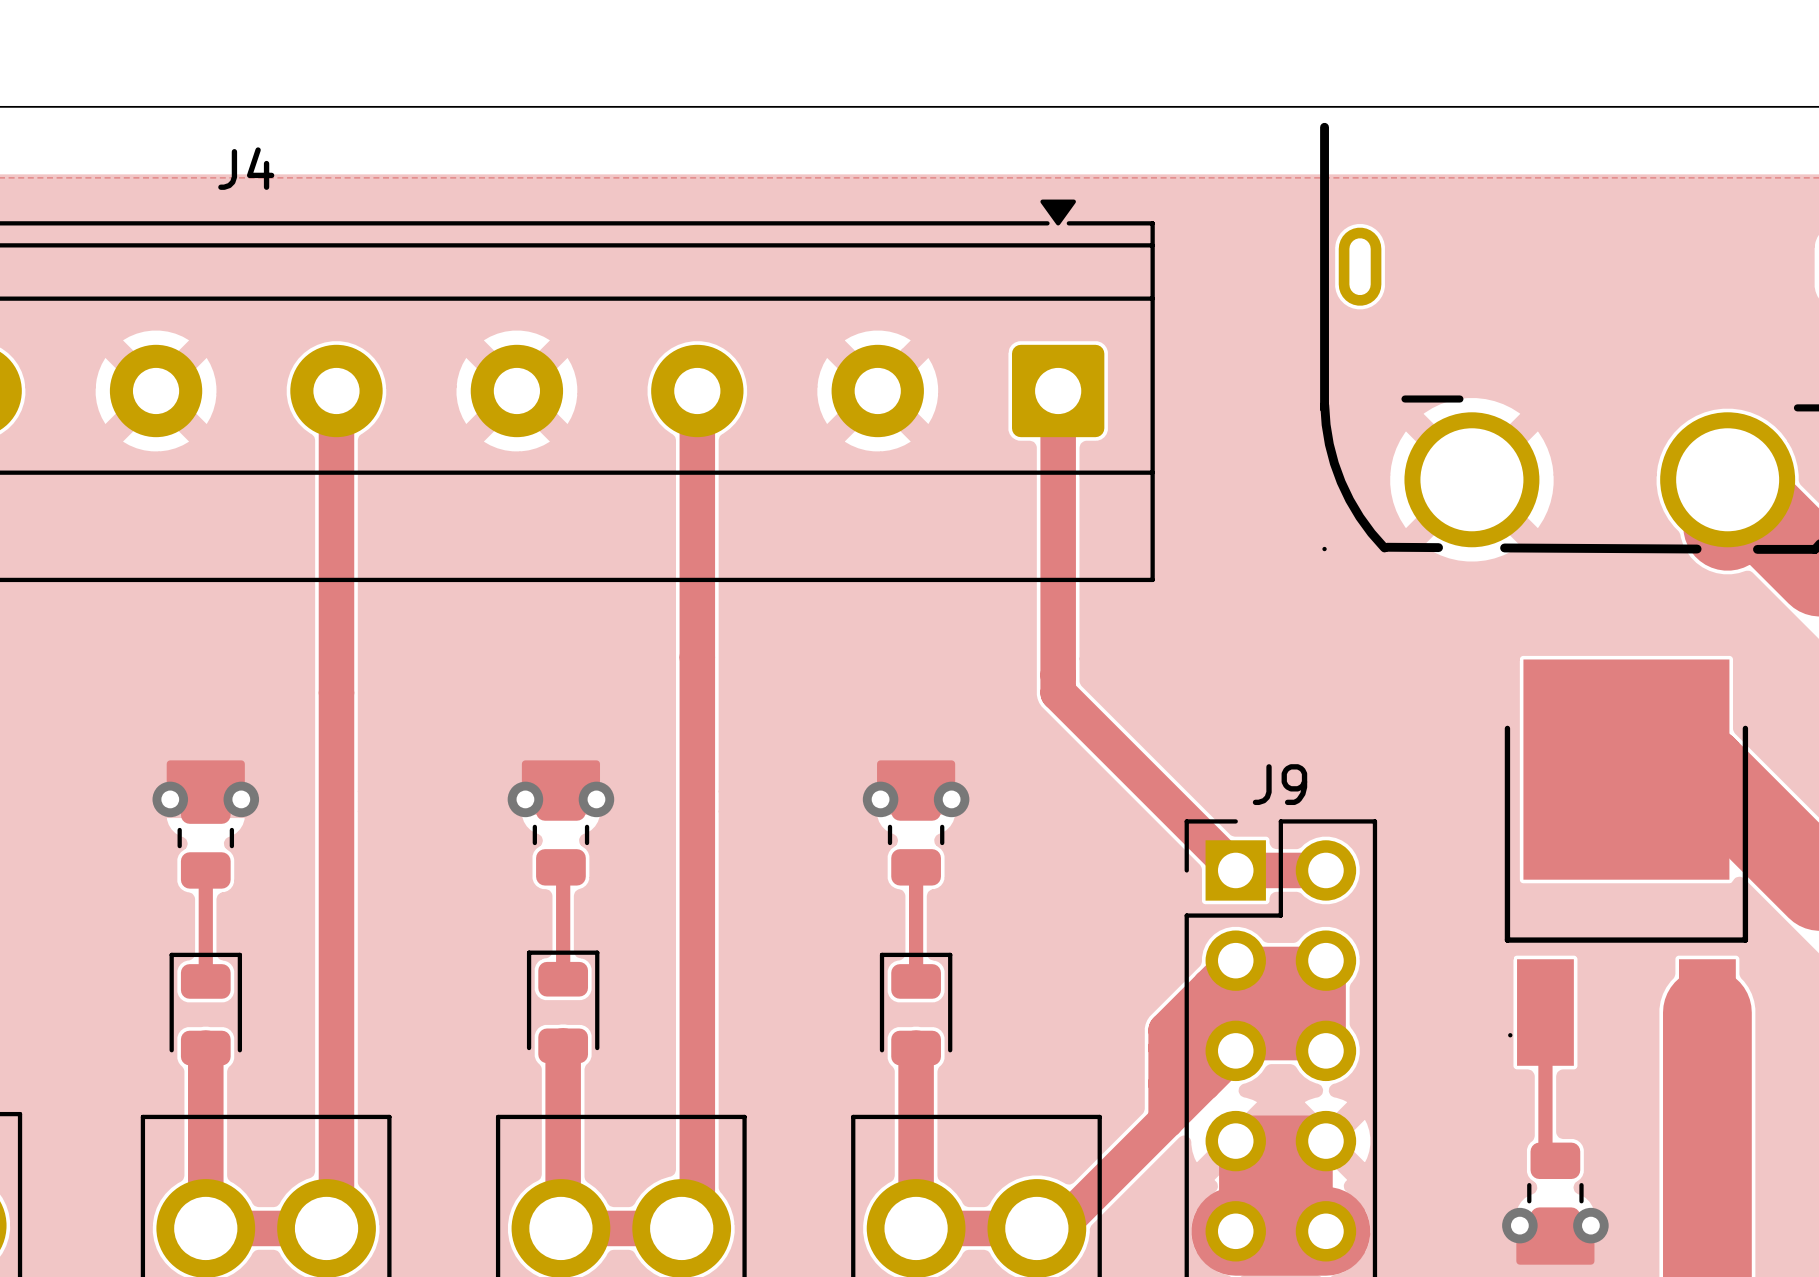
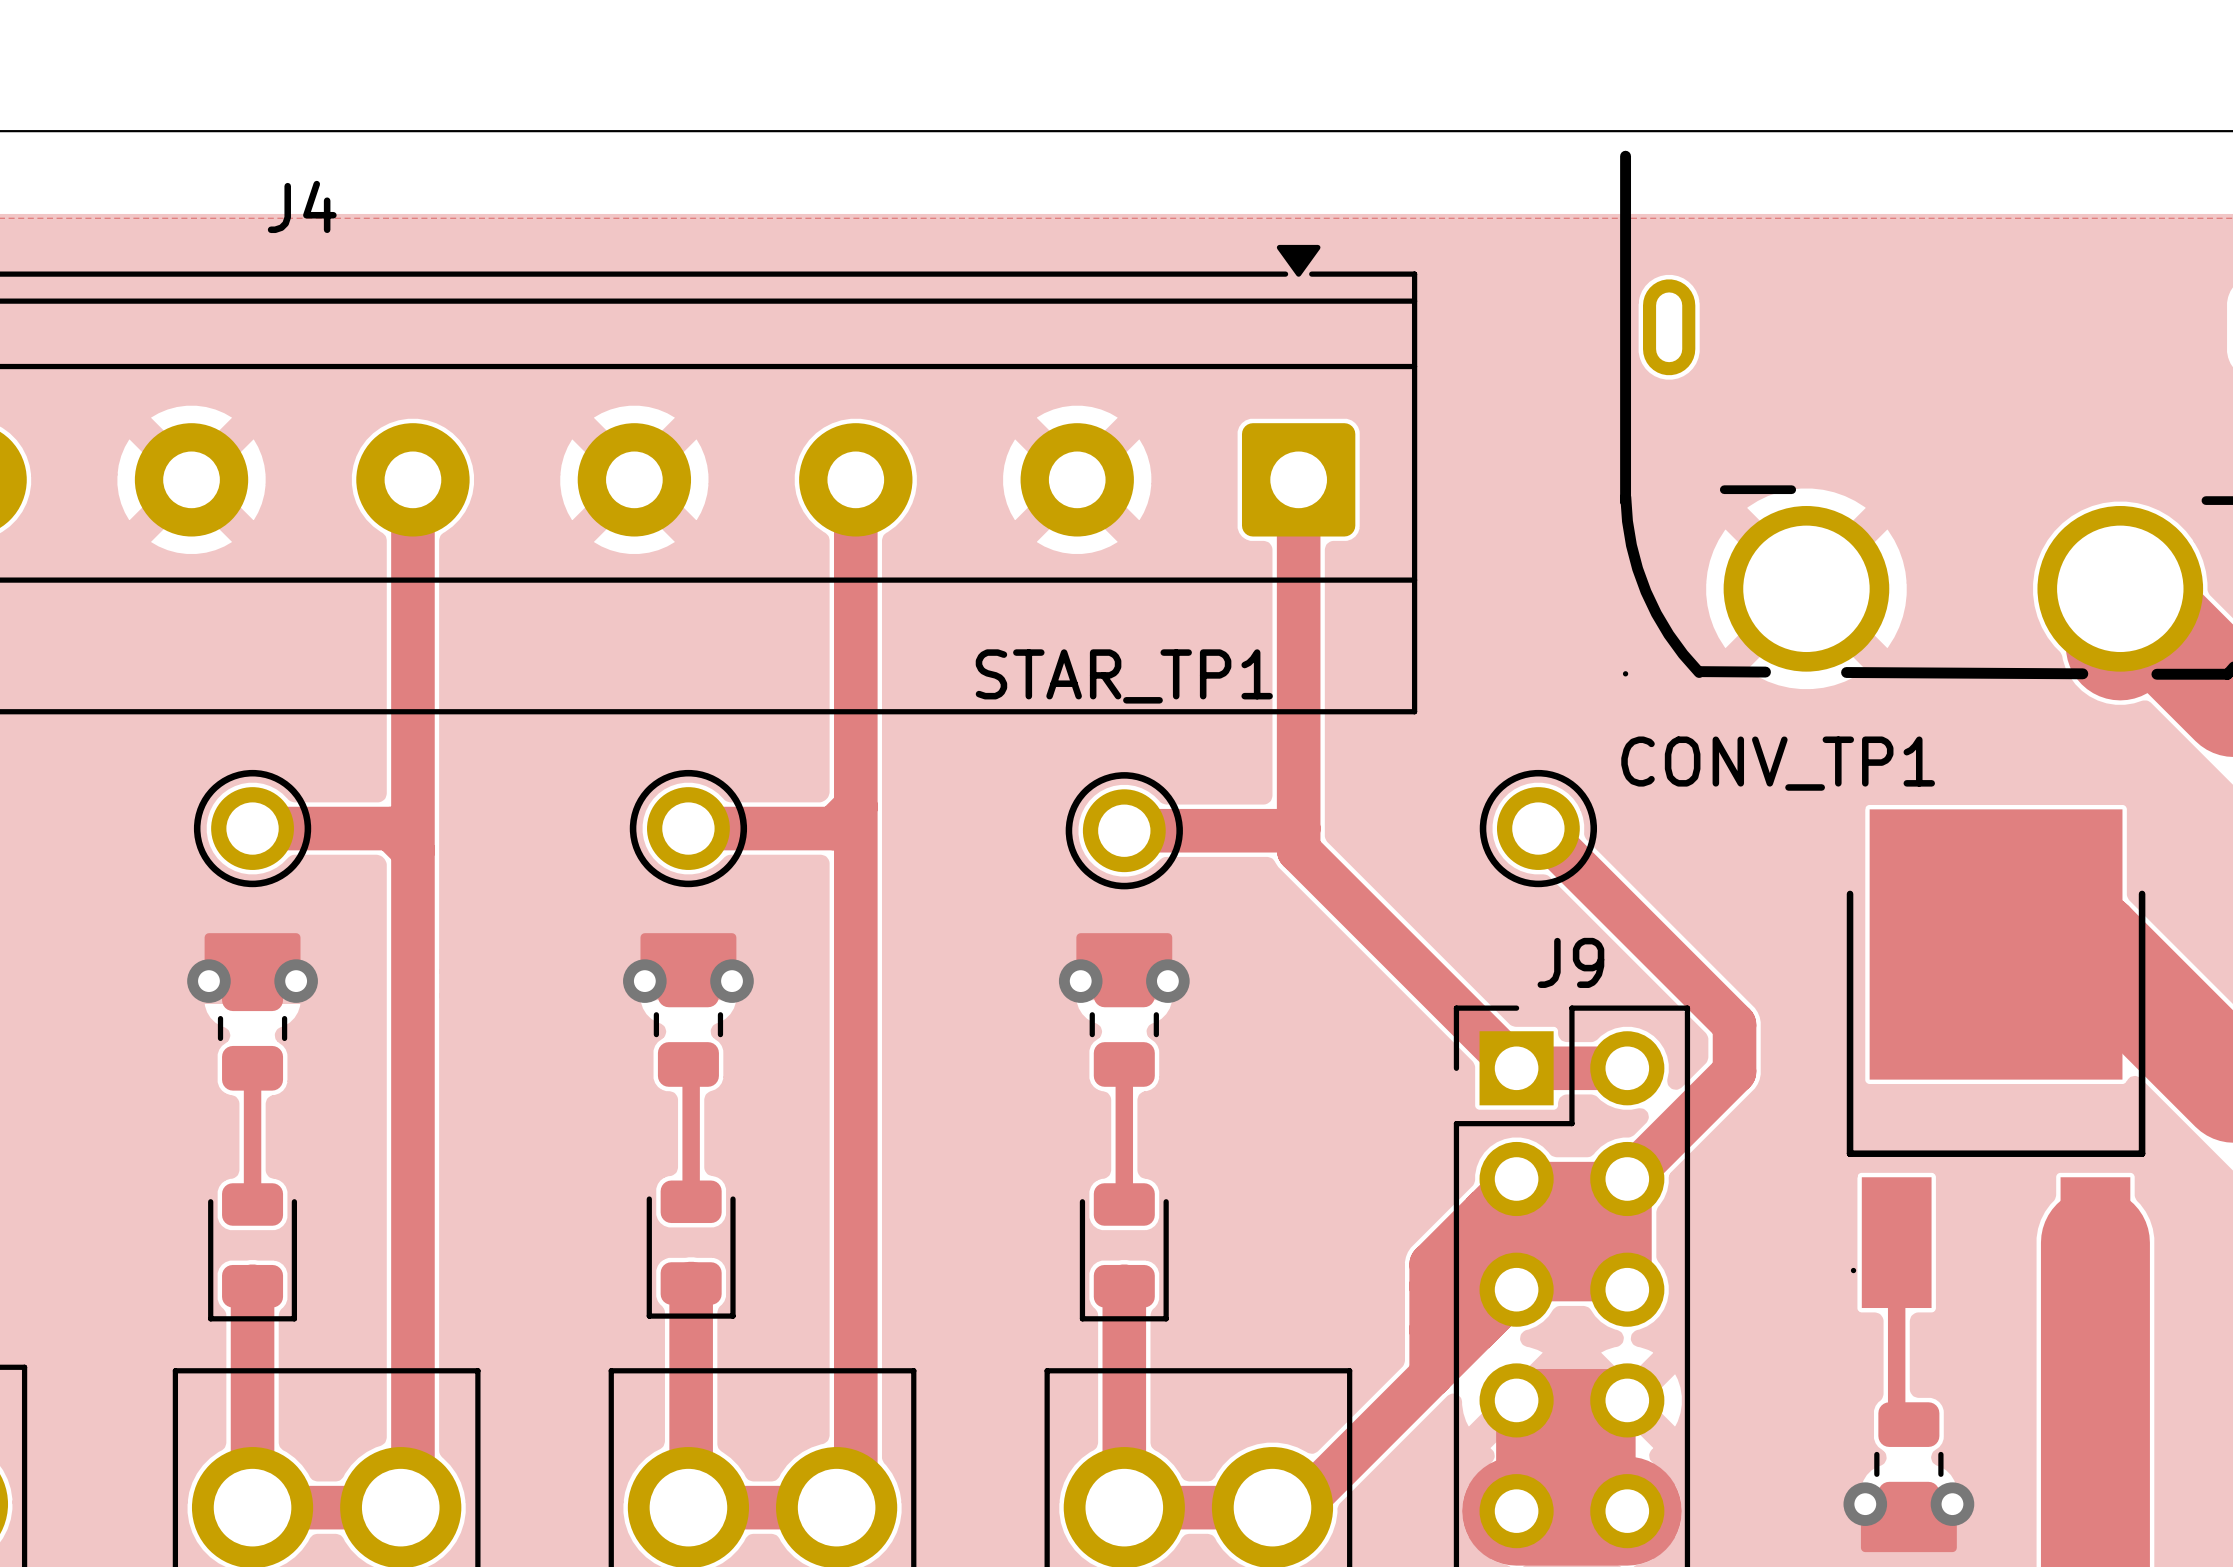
track: none -> (855, 806) (834, 828) (688, 828)
track: none -> (252, 828) (391, 828) (412, 850)
part: none -> (252, 828)
part: none -> (688, 828)
track: none -> (1298, 828) (1296, 830) (1124, 830)
track: none -> (1538, 828) (1734, 1024) (1734, 1071) (1627, 1178)
CONV_TP1: none -> (1538, 828)
STAR_TP1: none -> (1124, 830)
part rotation: 0° (563, 1006) -> 180° (691, 1249)
part rotation: 0° (205, 1009) -> 180° (252, 1252)
part rotation: 0° (916, 1009) -> 180° (1124, 1252)

